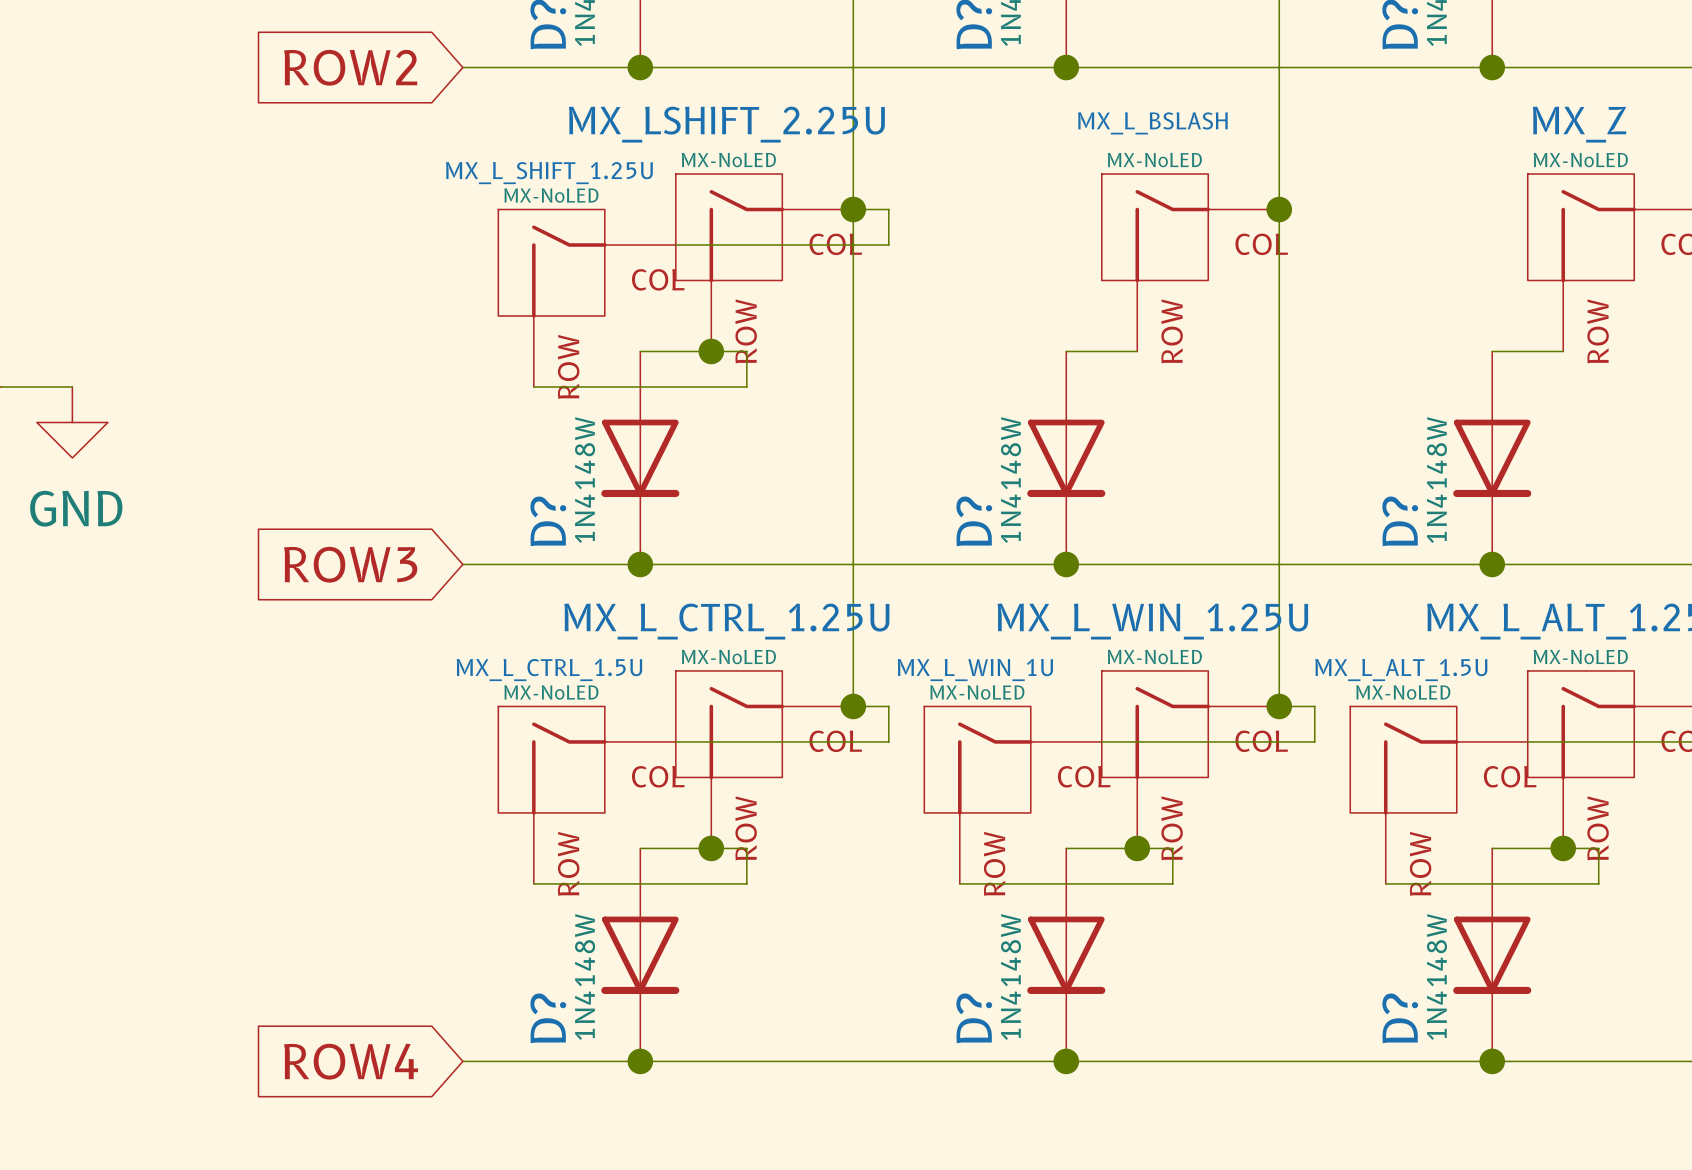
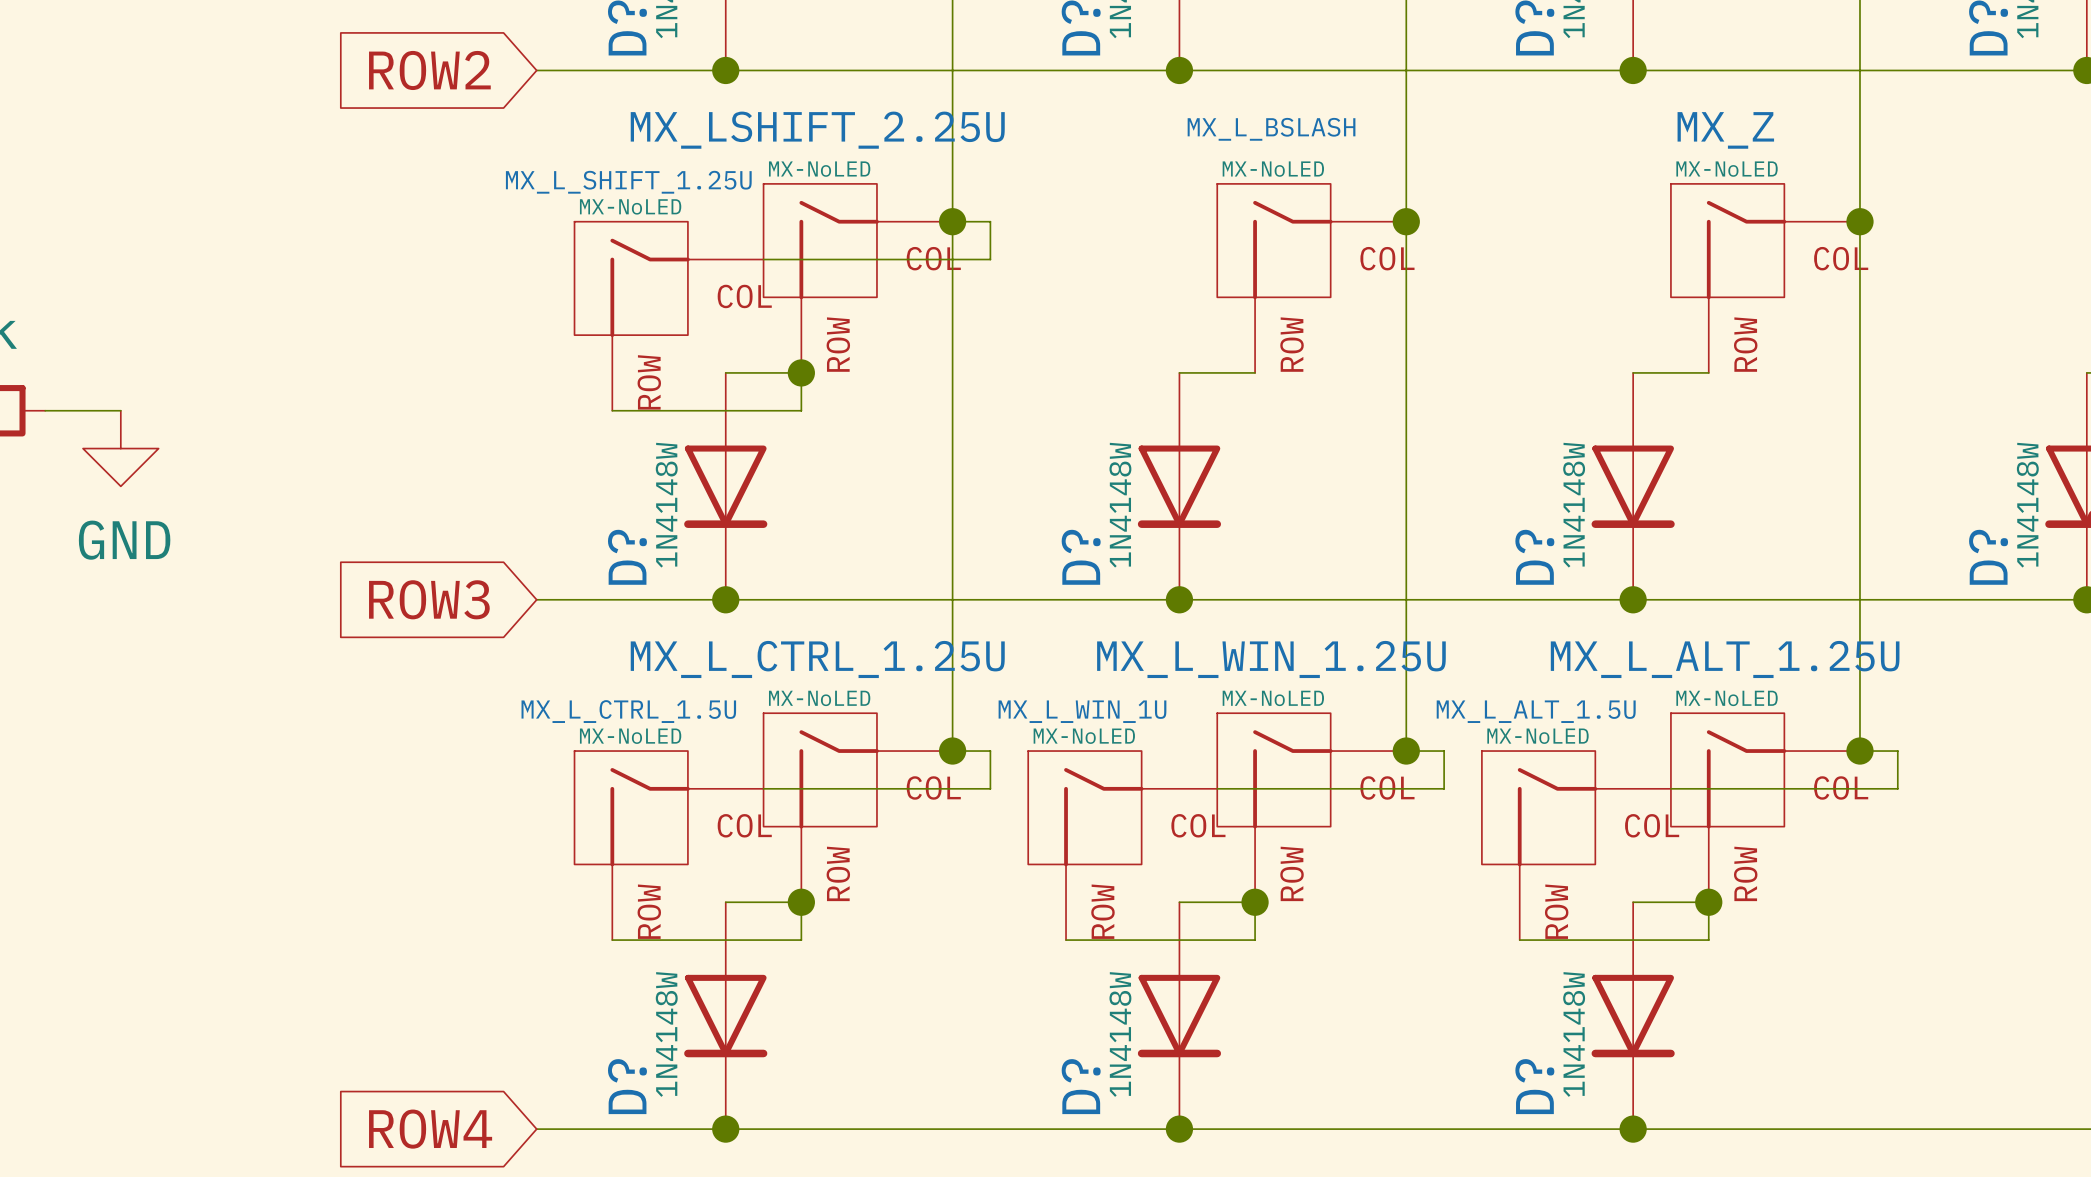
wire: (711, 351) (746, 351) (746, 386) (711, 386) -> (801, 372) (801, 410)
wire: (711, 848) (746, 848) (746, 883) (711, 883) -> (801, 902) (801, 940)
wire: (1137, 848) (1172, 848) (1172, 883) (1137, 883) -> (1255, 902) (1255, 940)
wire: (1563, 848) (1598, 848) (1598, 883) (1563, 883) -> (1708, 902) (1708, 940)

